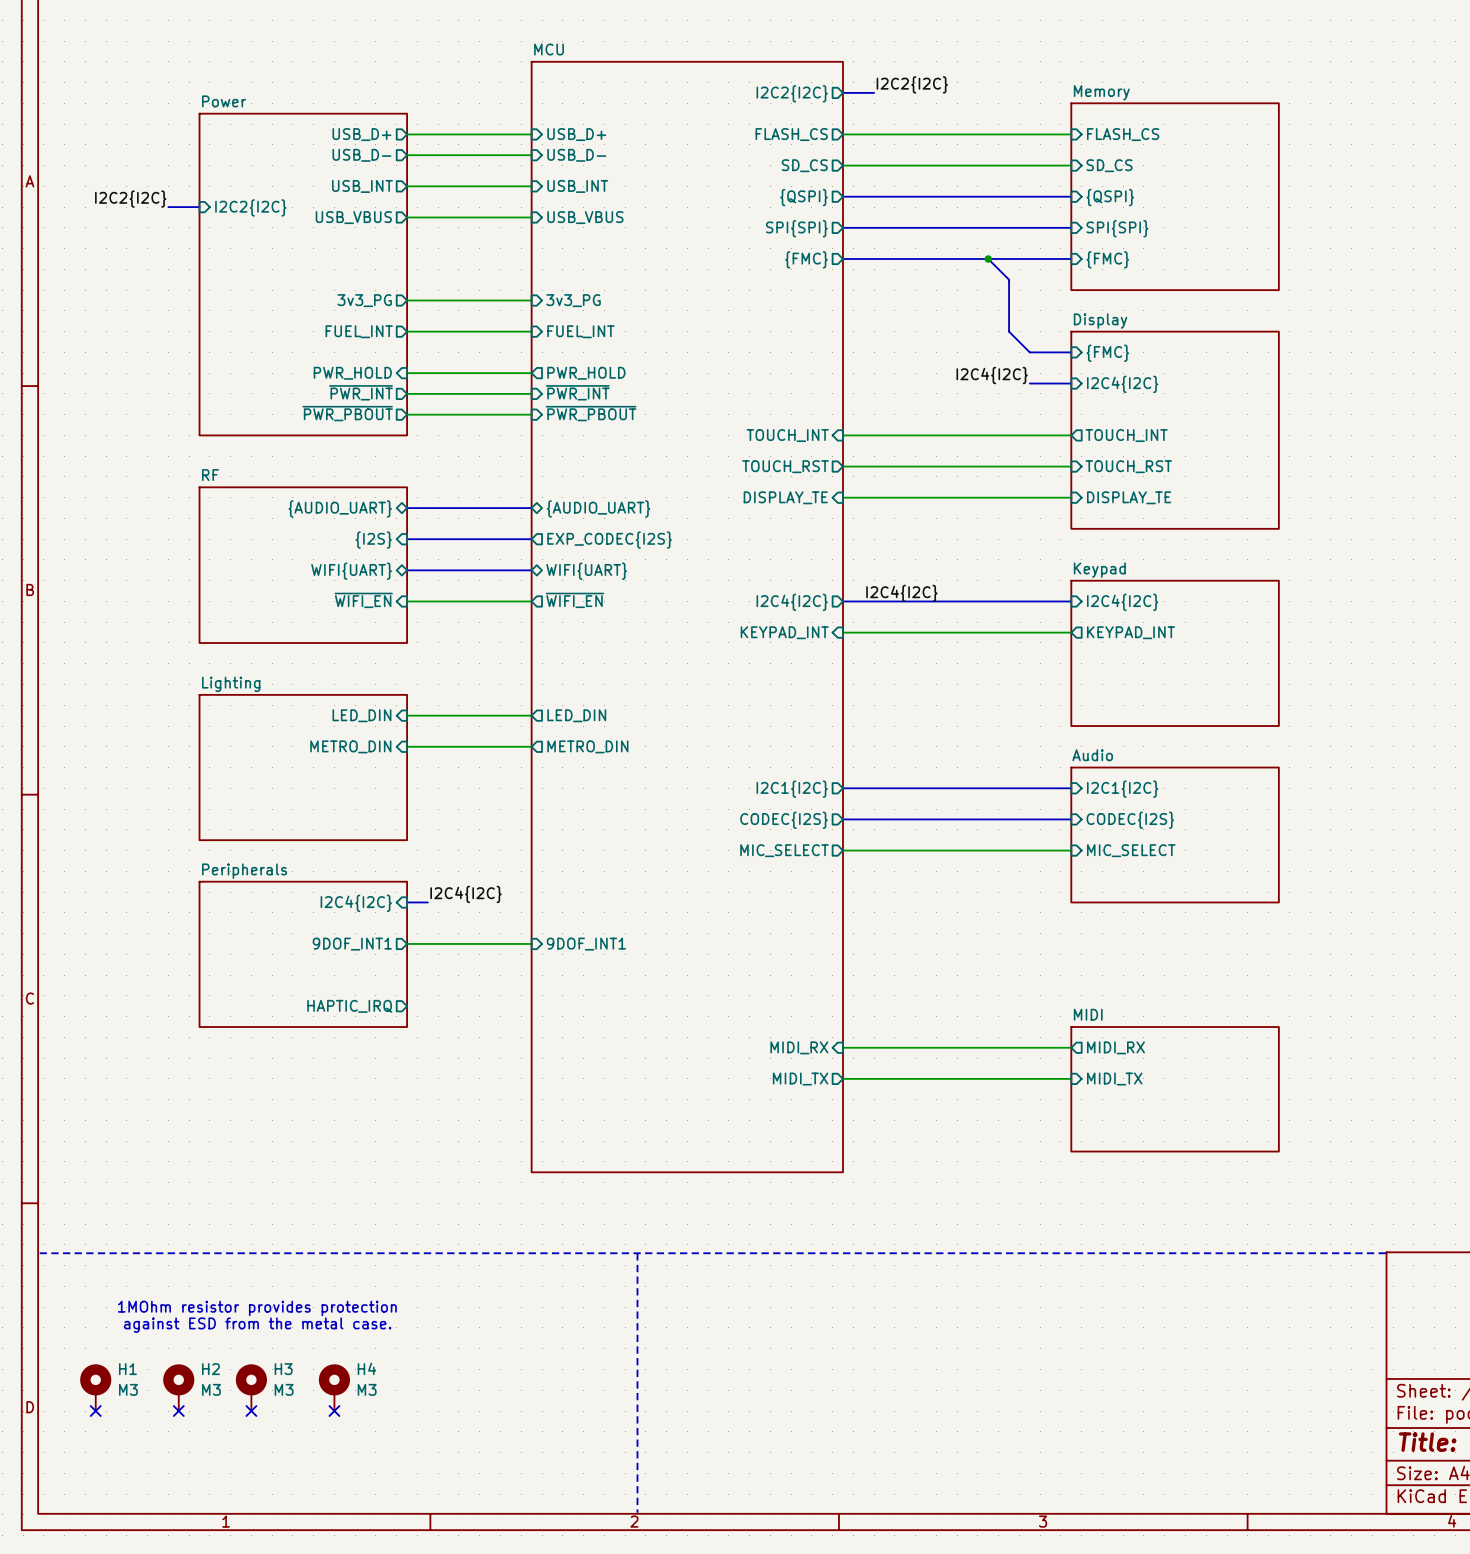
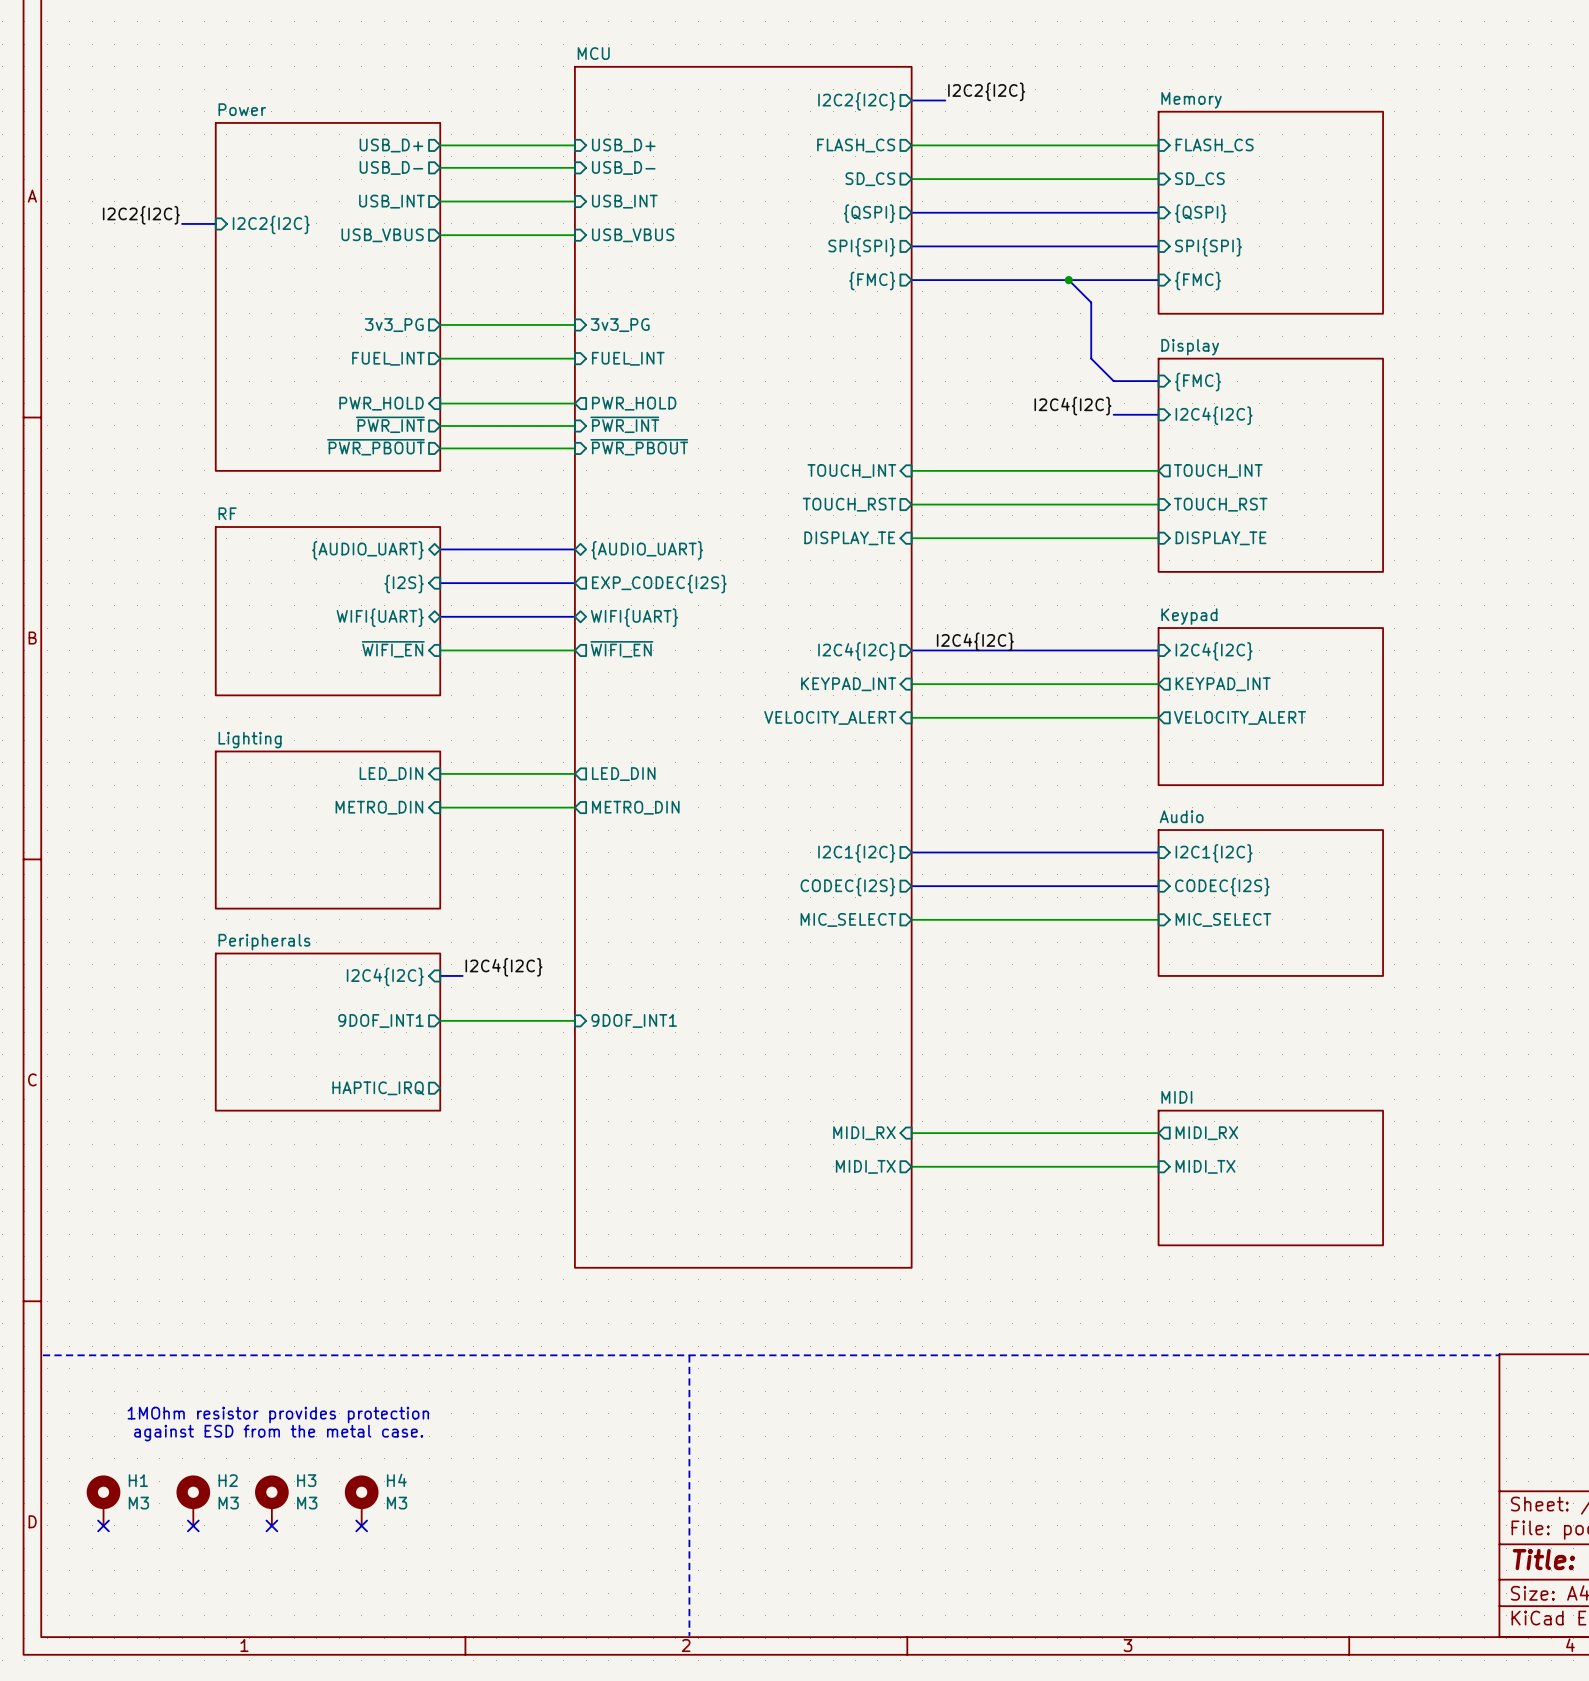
sheet pin: none -> VELOCITY_ALERT (830, 717)
wire: none -> (911, 717) (1158, 717)
sheet pin: none -> VELOCITY_ALERT (1239, 717)

